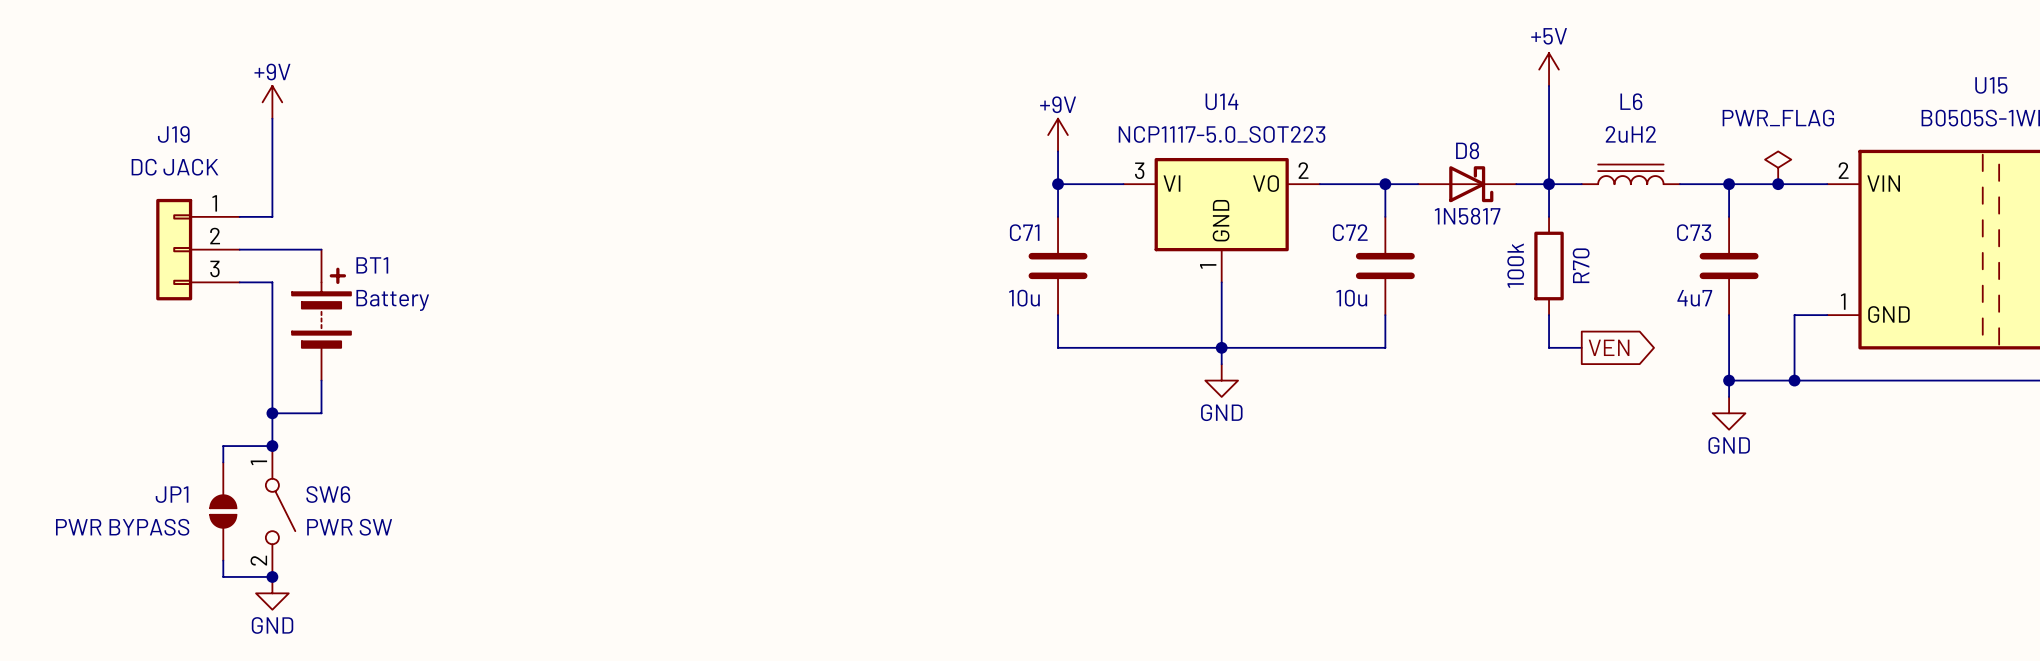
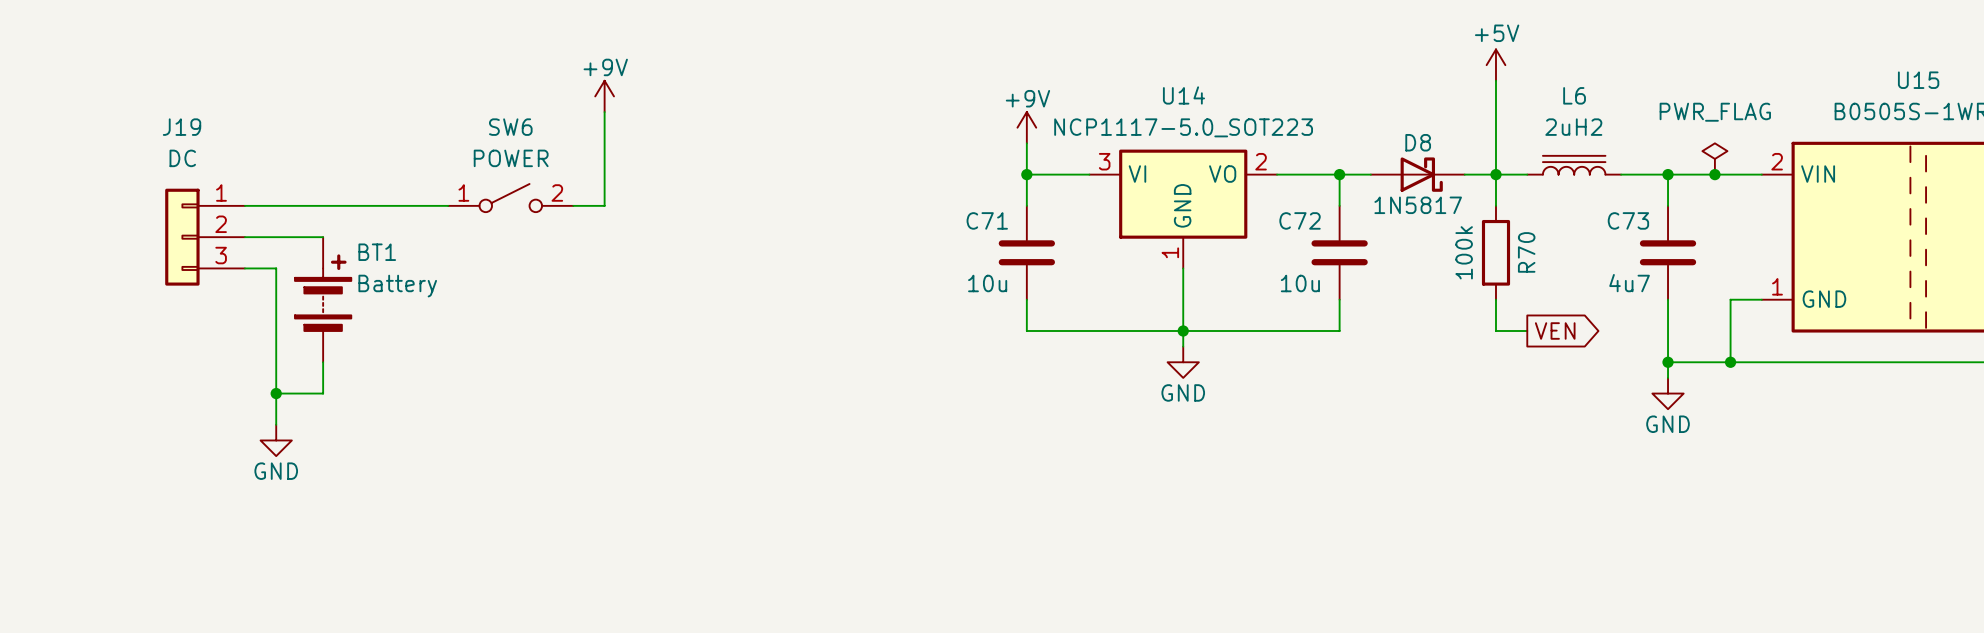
power symbol: +9V (272, 102) -> none
power symbol: none -> +9V (604, 96)
wire: (272, 118) (272, 216) -> (448, 205) (276, 205)
wire: none -> (604, 112) (604, 205) (573, 205)
J19 value: DC JACK (174, 167) -> DC (182, 158)
wire: (272, 446) (223, 446) (223, 462) -> none
junction: (272, 446) -> none
JP1: PWR BYPASS (223, 511) -> none
SW6 rotation: 0° (280, 511) -> 90° counterclockwise (510, 198)
SW6 position: (280, 511) -> (510, 198)
SW6 value: PWR SW (349, 527) -> POWER (511, 158)
wire: (223, 560) (223, 576) (272, 576) -> none
junction: (272, 576) -> none
power symbol position: GND (272, 593) -> GND (276, 440)

